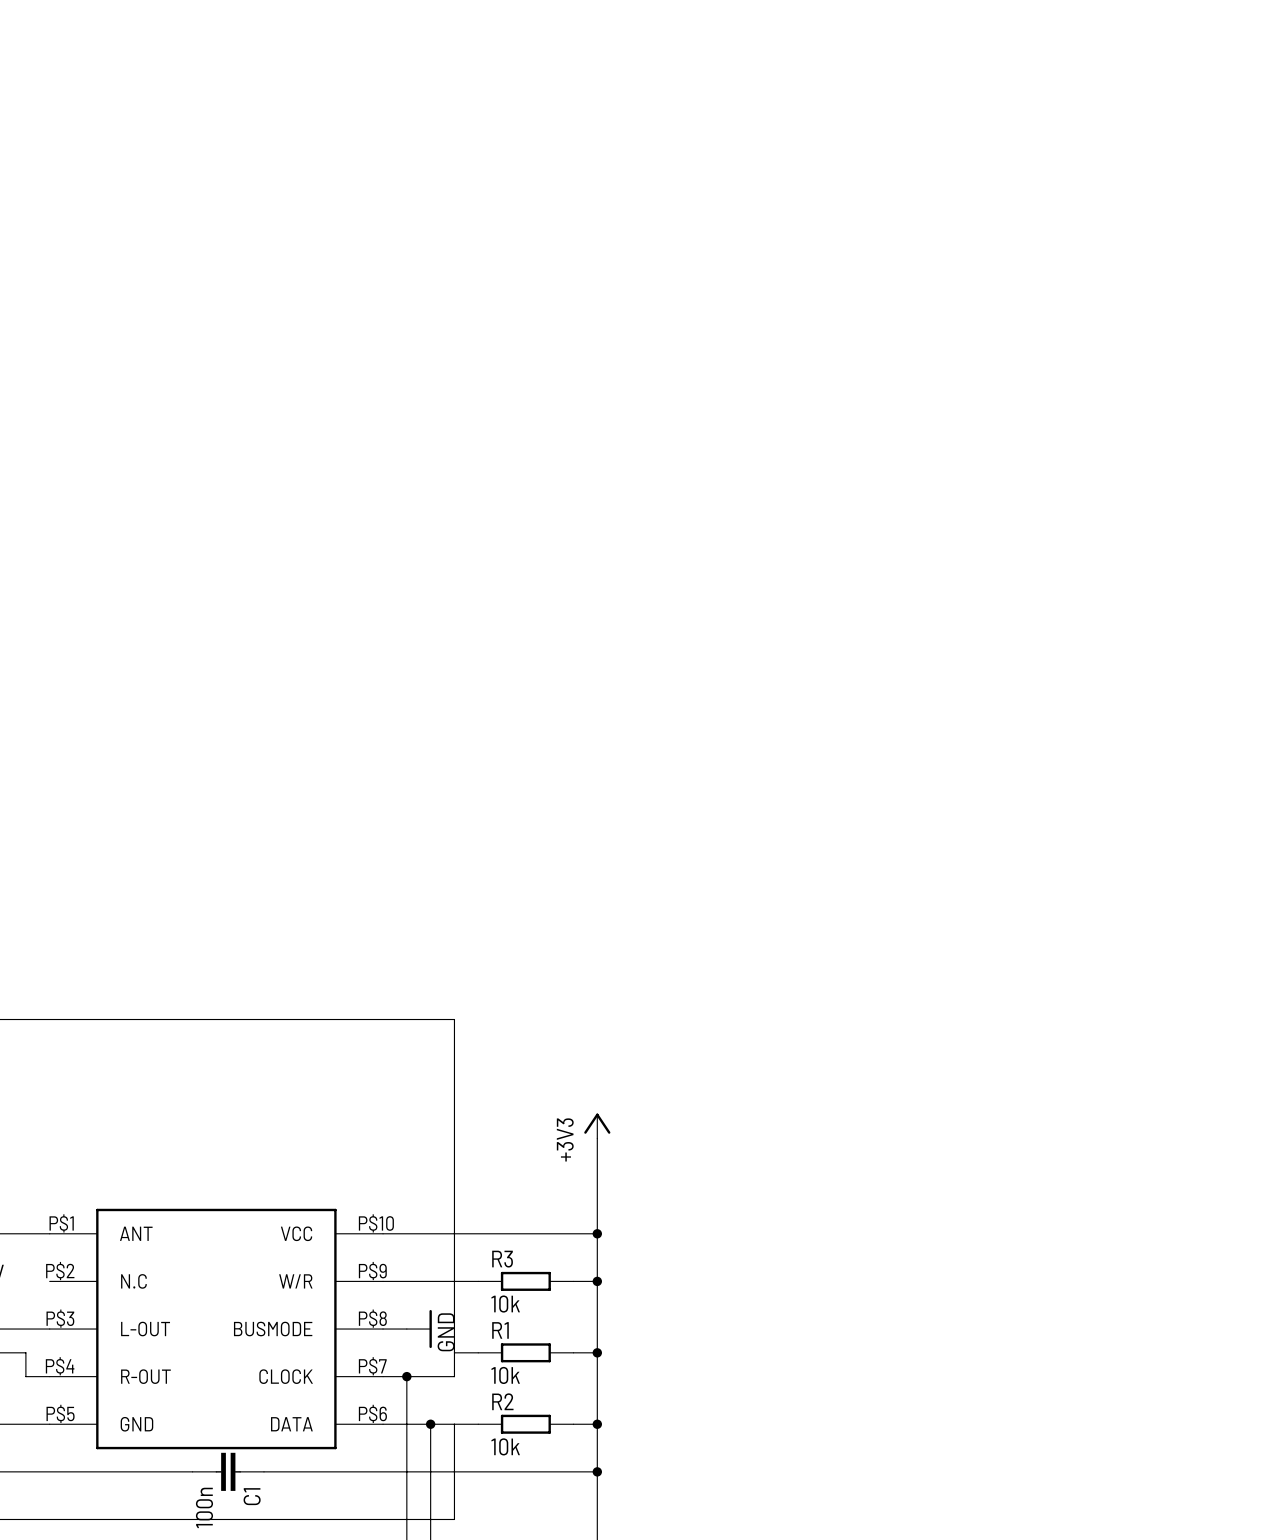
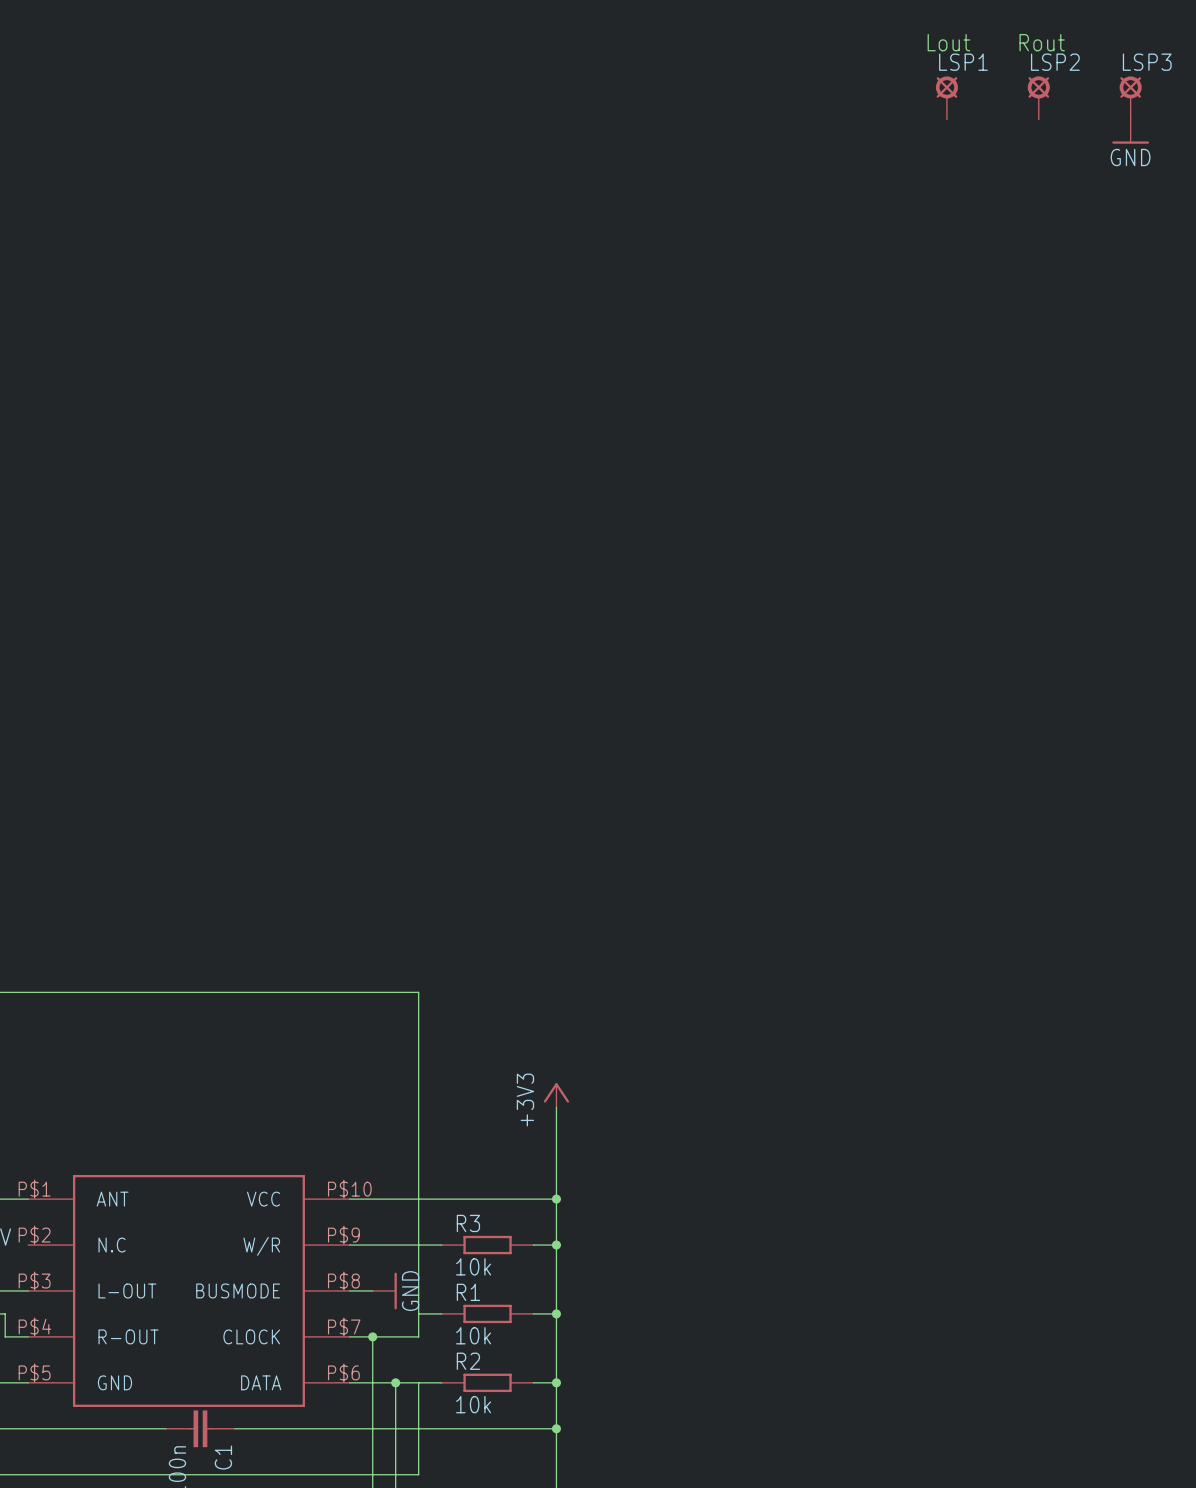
text: none -> Lout (948, 42)
text: none -> Rout (1042, 42)
LSP1: none -> (946, 98)
LSP2: none -> (1038, 98)
LSP3: none -> (1130, 98)
power symbol: none -> GND (1130, 131)

